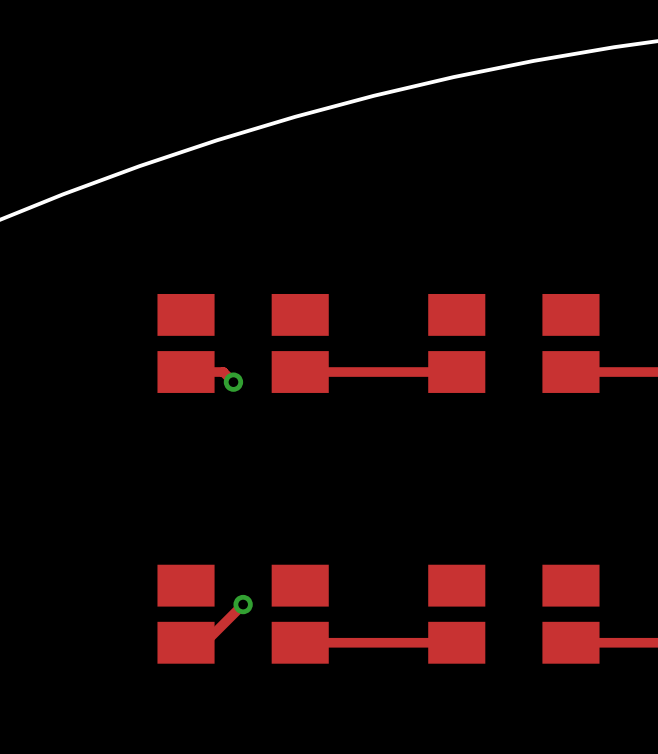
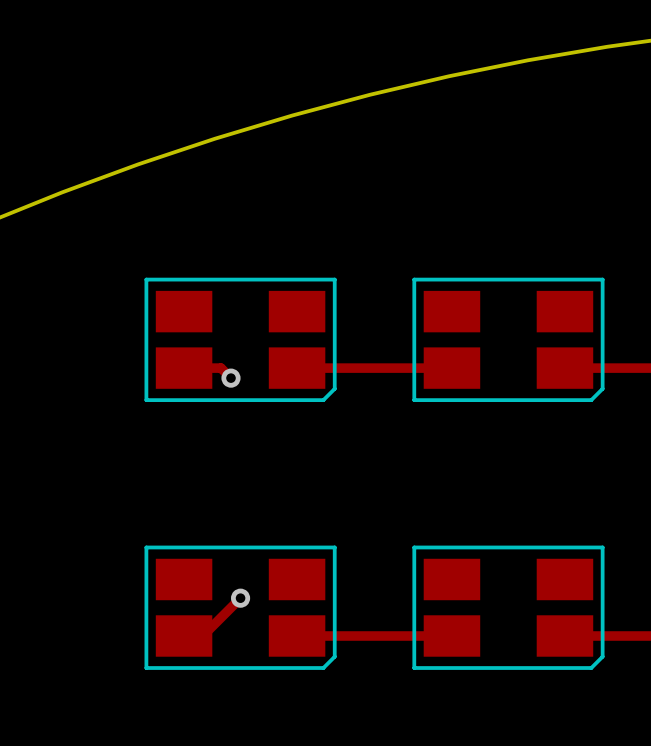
part footprint: [157, 293, 329, 393] -> [144, 277, 337, 403]
part footprint: [428, 293, 600, 393] -> [412, 277, 605, 403]
part footprint: [157, 564, 329, 664] -> [144, 545, 337, 670]
part footprint: [428, 564, 600, 664] -> [412, 545, 605, 670]

